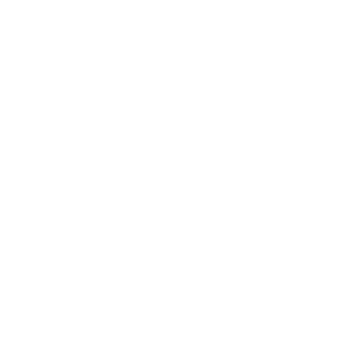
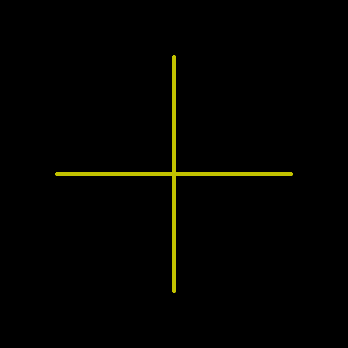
board edge: none -> (174, 56) (174, 291)
board edge: none -> (56, 174) (291, 174)

